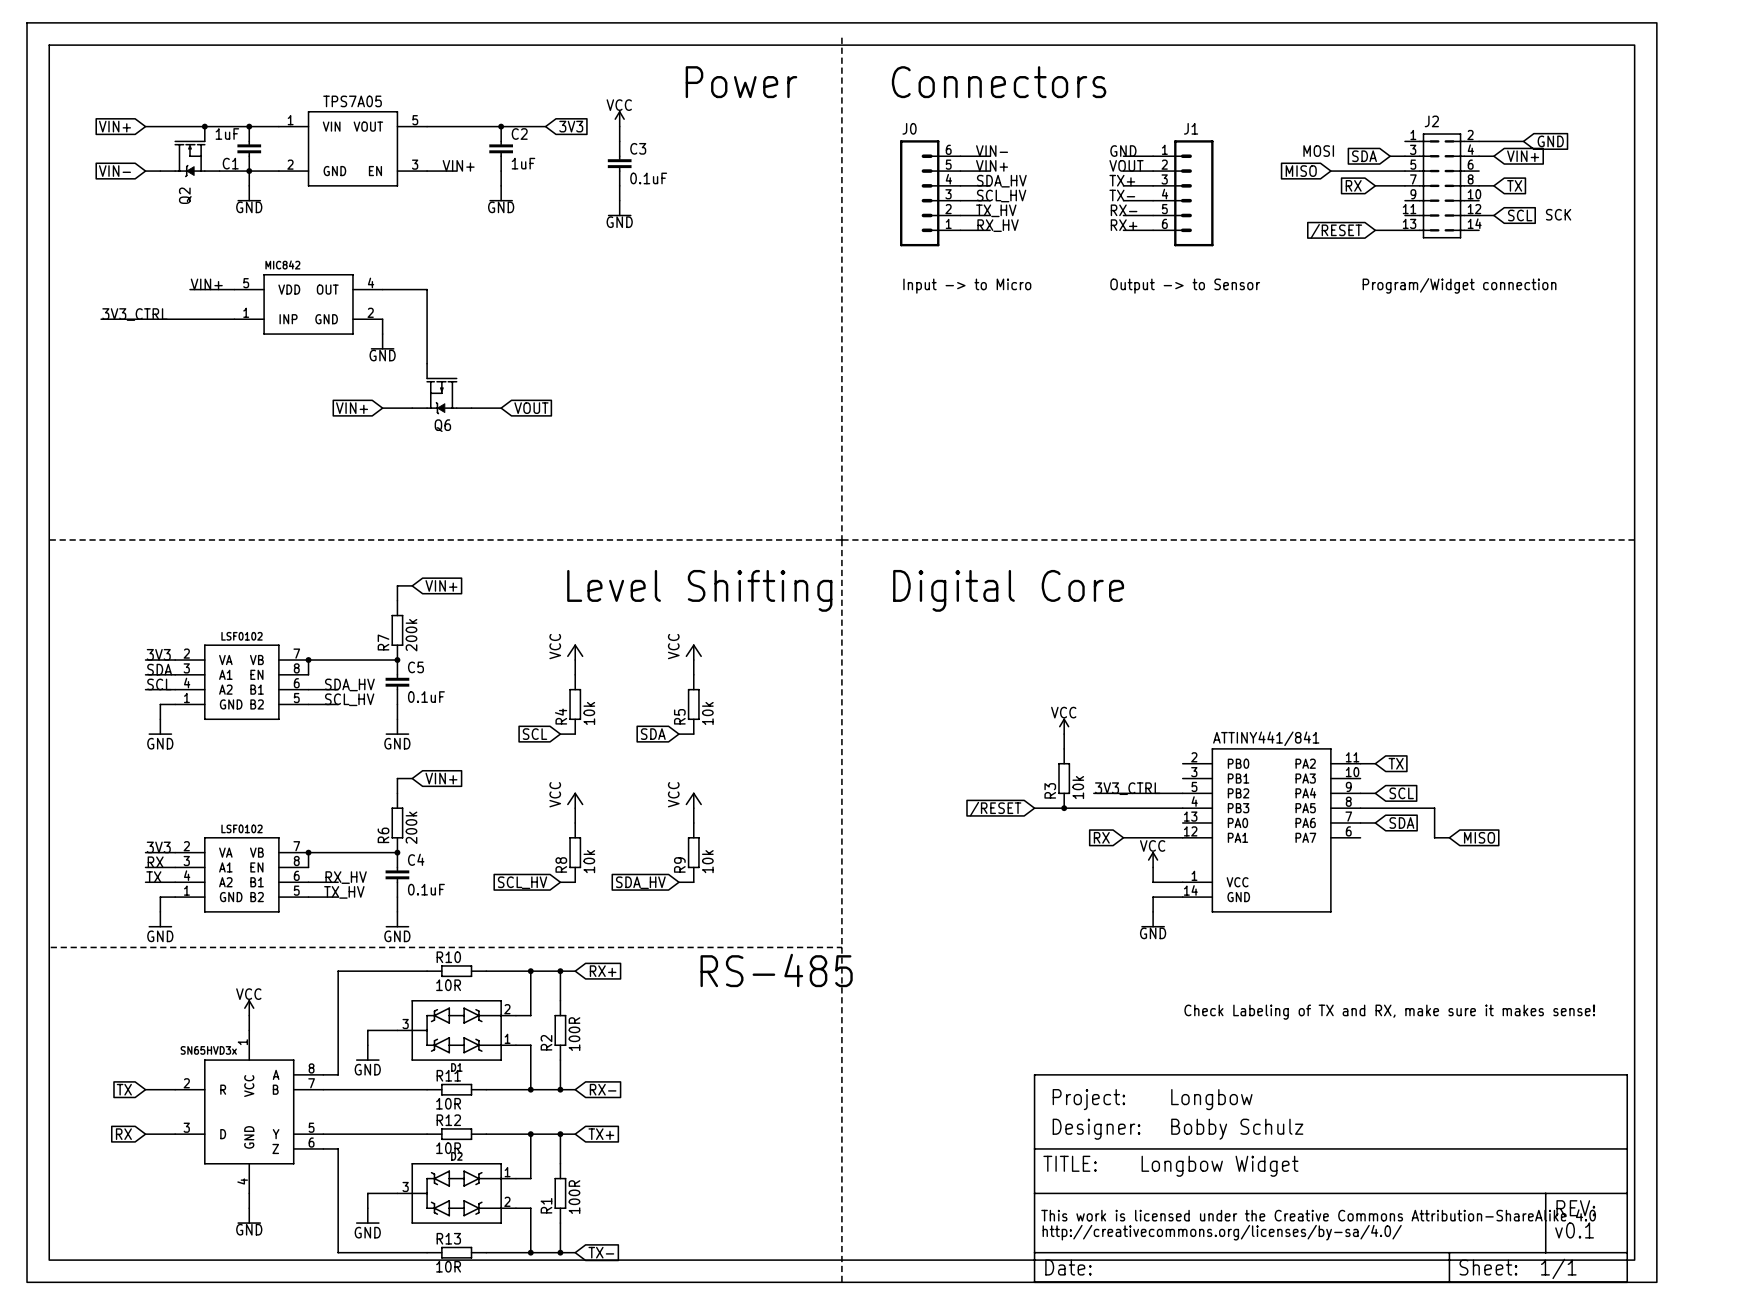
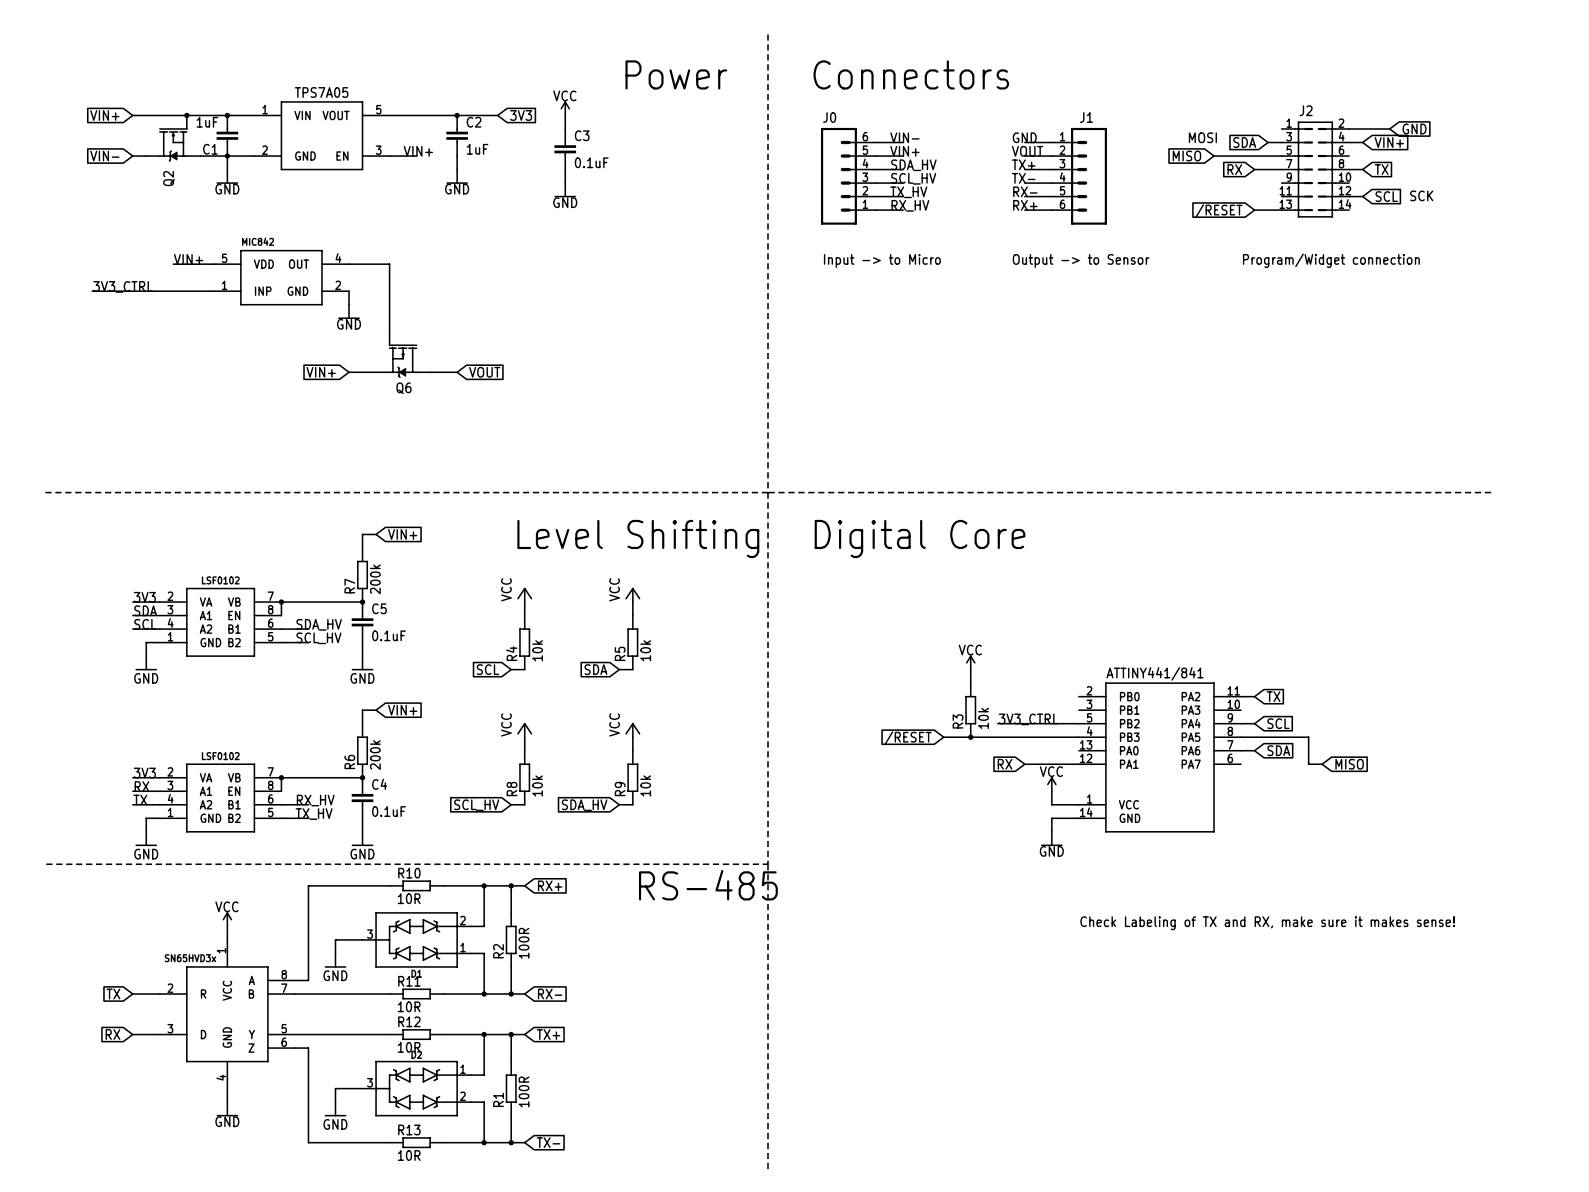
part: (841, 652) -> none
part: (1330, 1178) -> none

